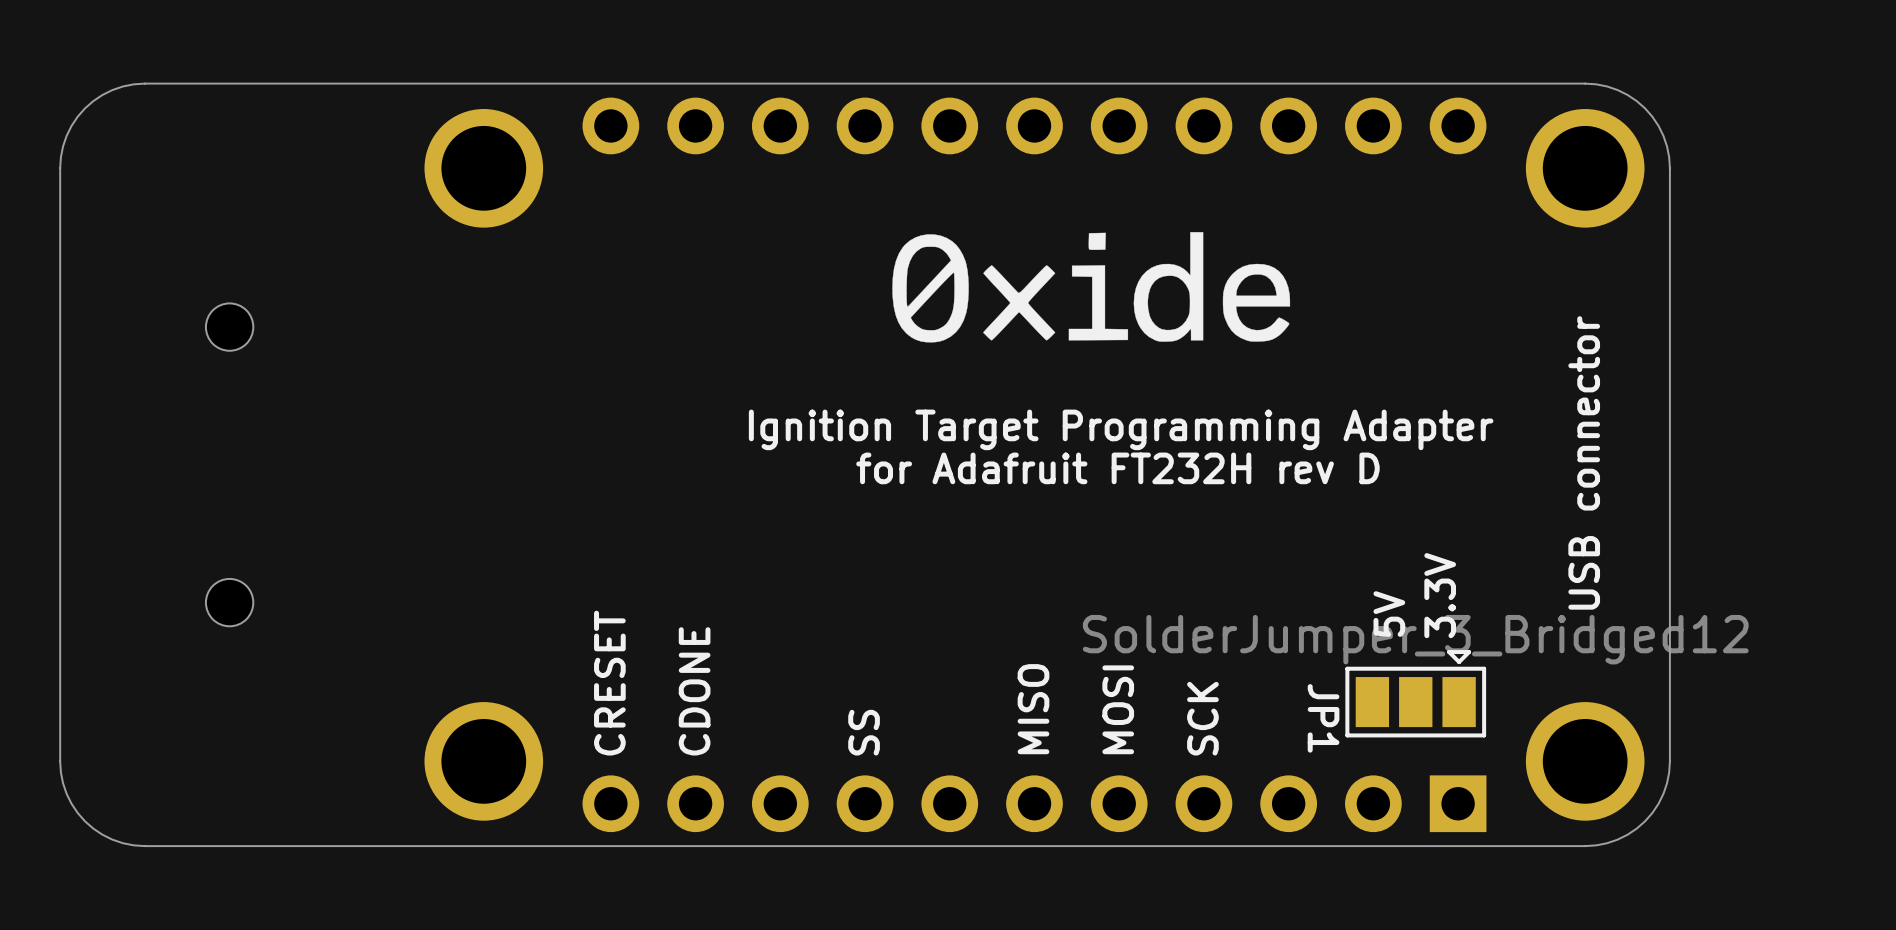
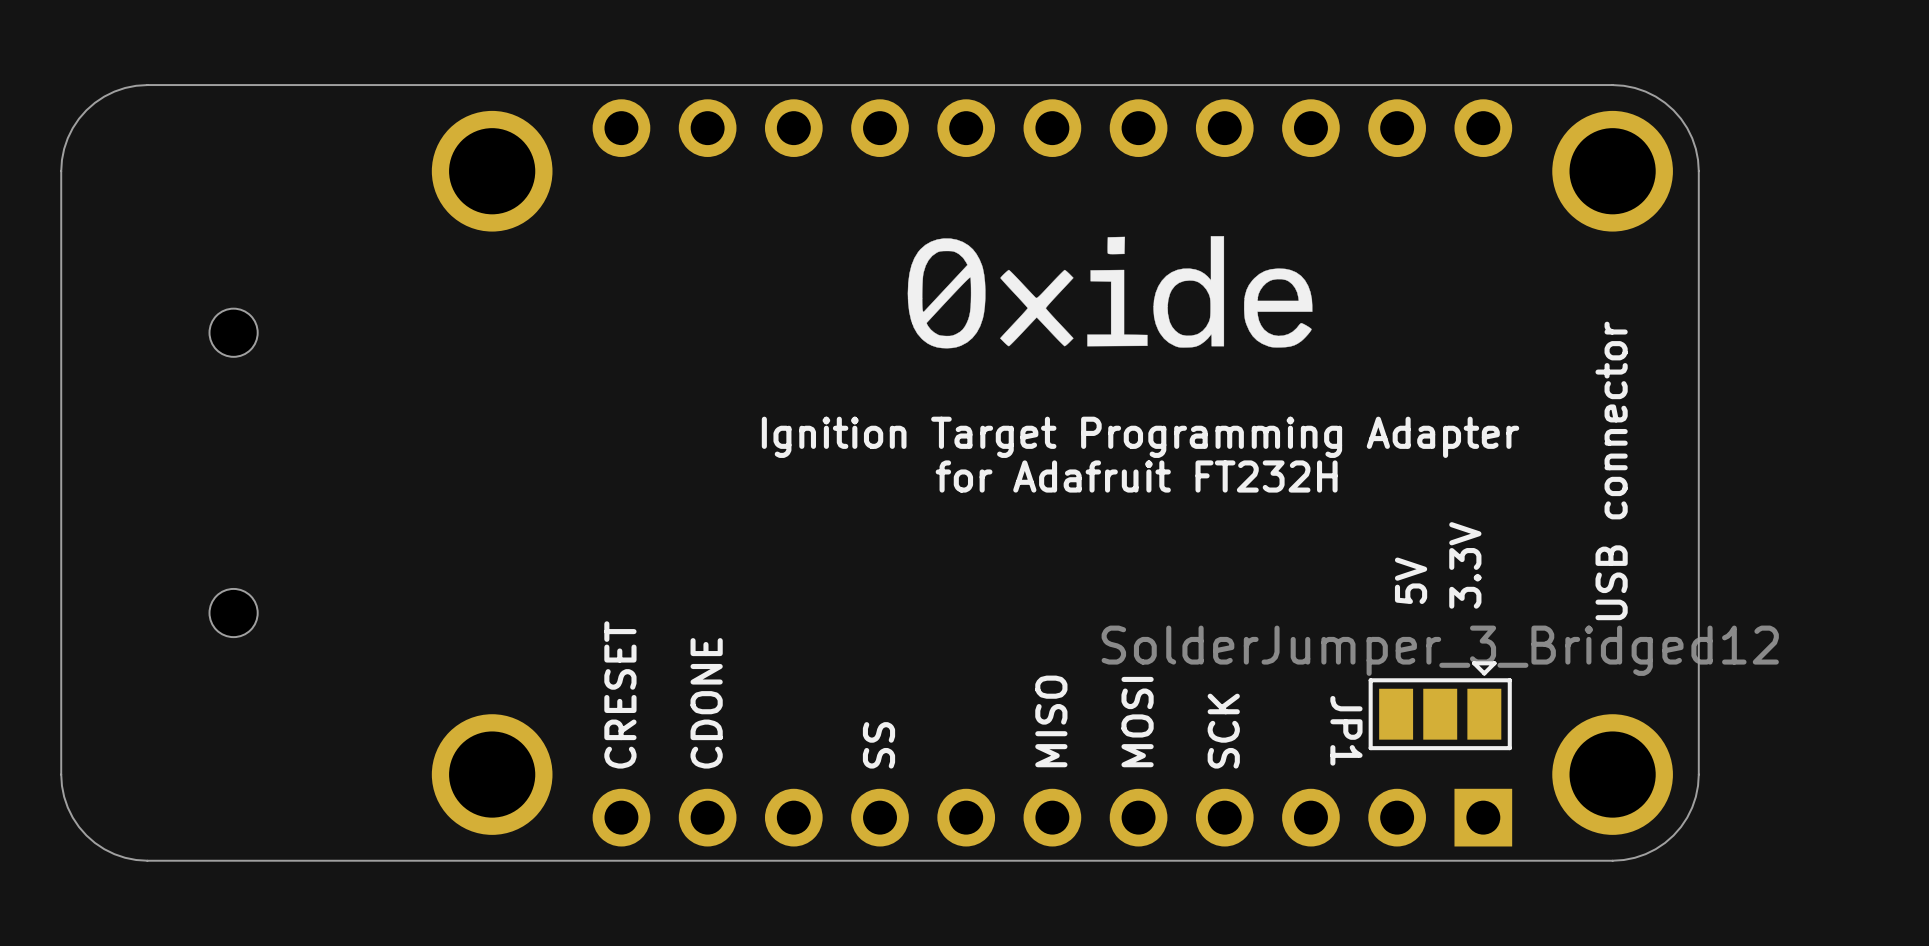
text: for Adafruit FT232H rev D (1117, 468) -> for Adafruit FT232H (1136, 476)
text position: 3.3V (1440, 595) -> 3.3V (1465, 565)
text position: 5V (1389, 614) -> 5V (1411, 580)

